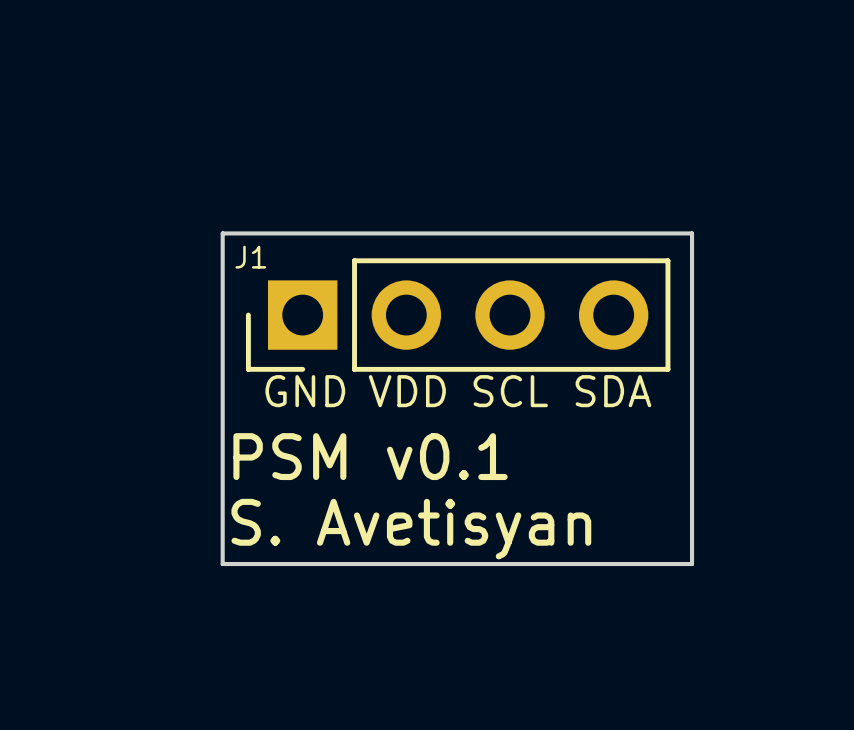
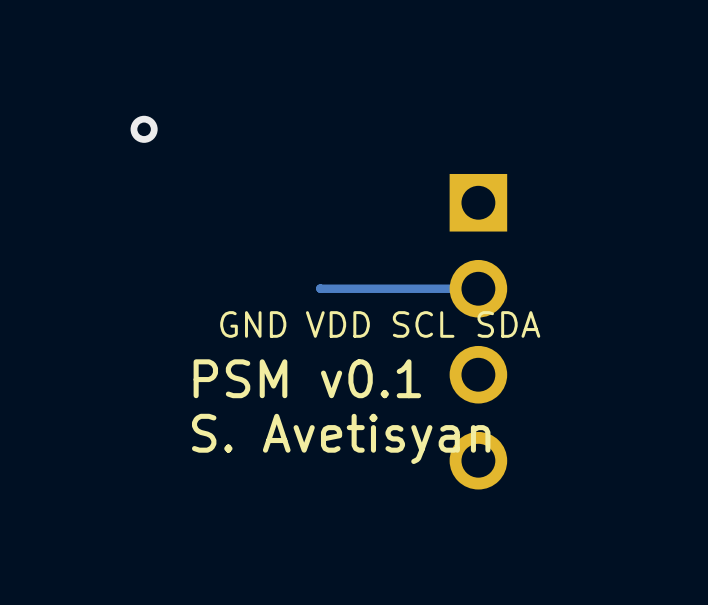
via: none -> (144, 129)
board edge: (692, 233) (222, 233) (222, 564) (692, 564) (692, 233) -> none
J1: (458, 315) -> none
track: none -> (478, 288) (320, 288)
part: none -> (478, 331)

